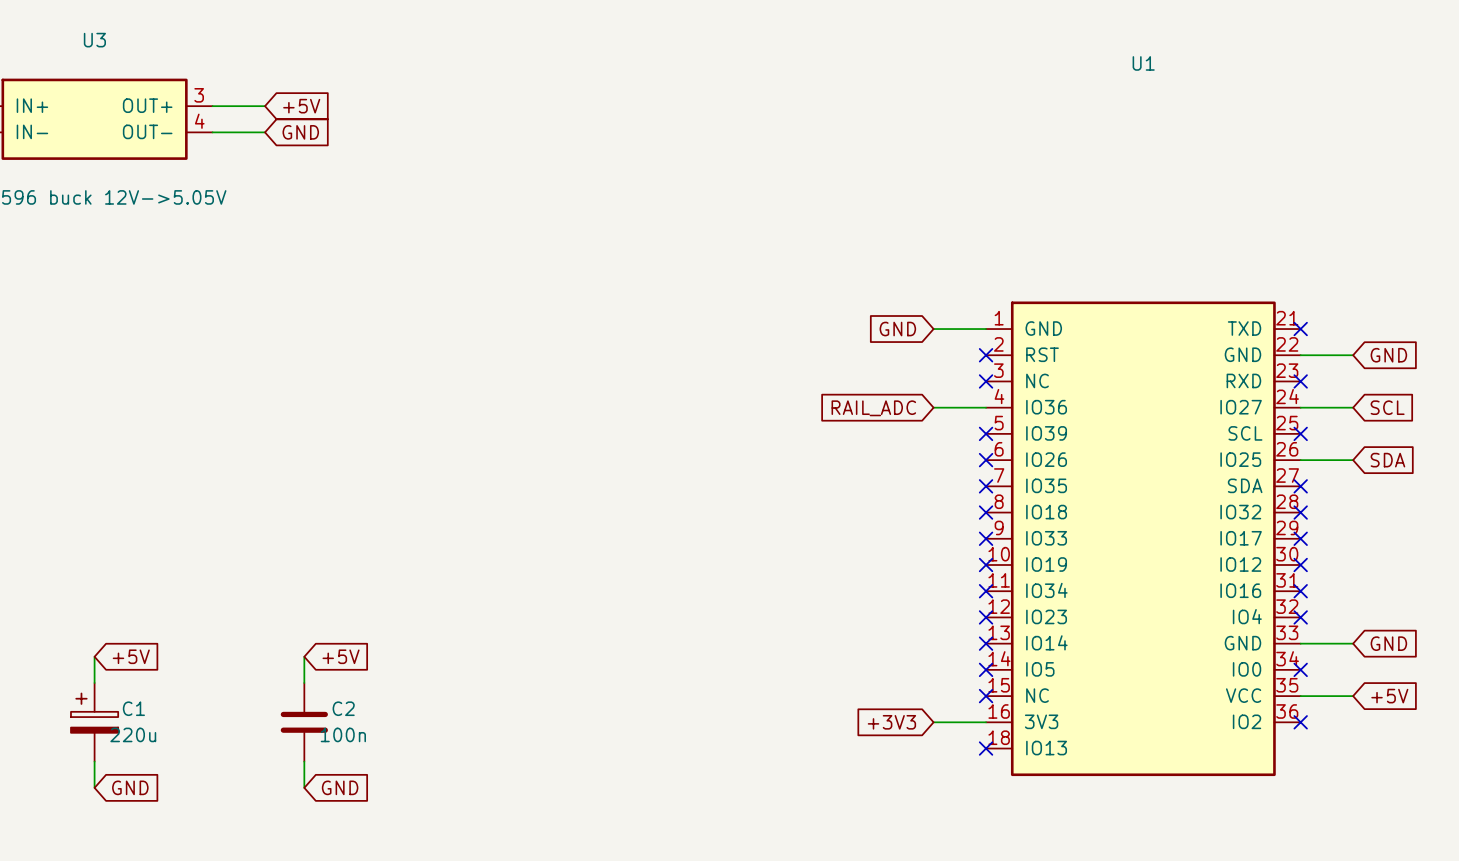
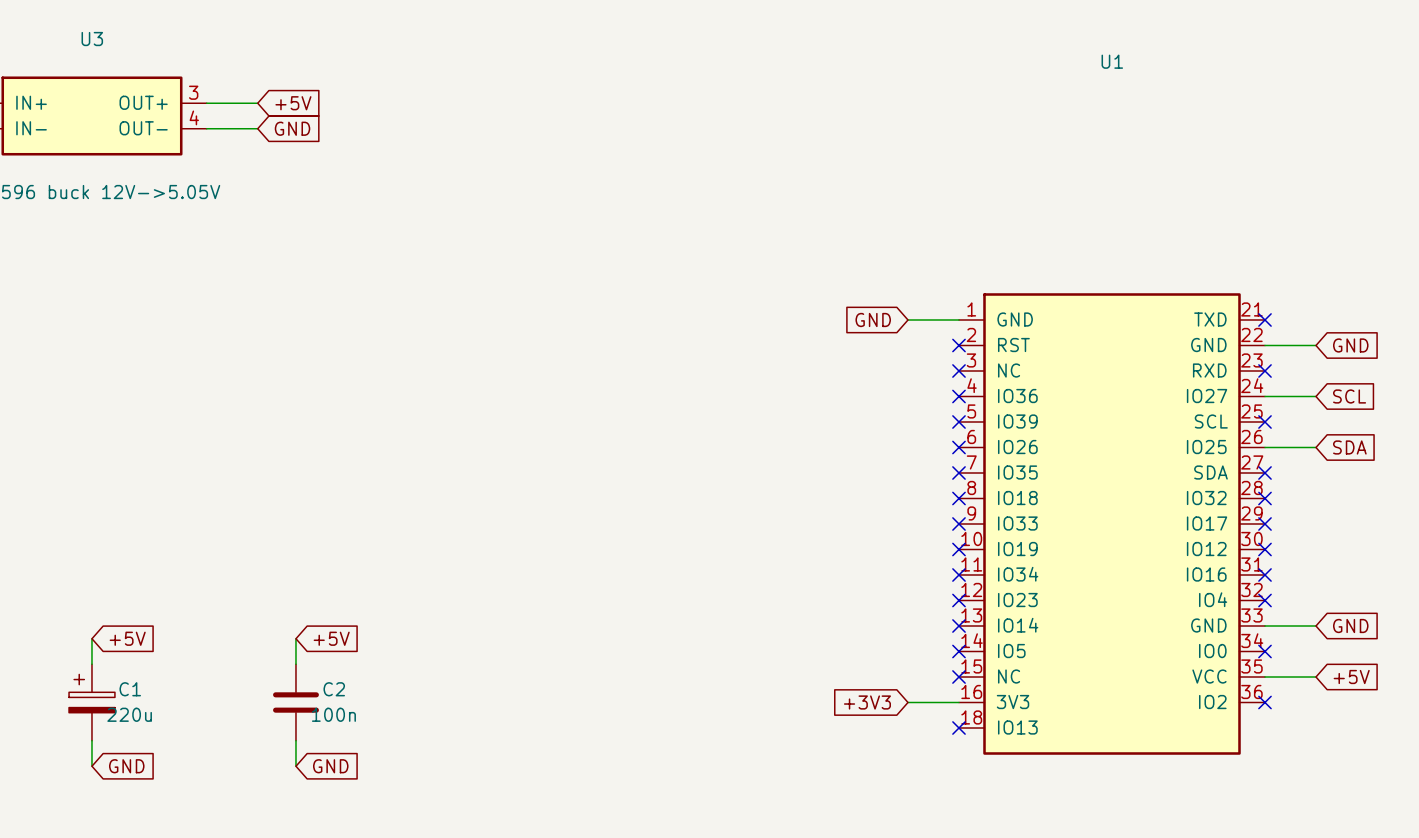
wire: (933, 407) (986, 407) -> none
no-connect mark: none -> (958, 396)
global label: RAIL_ADC (873, 408) -> none

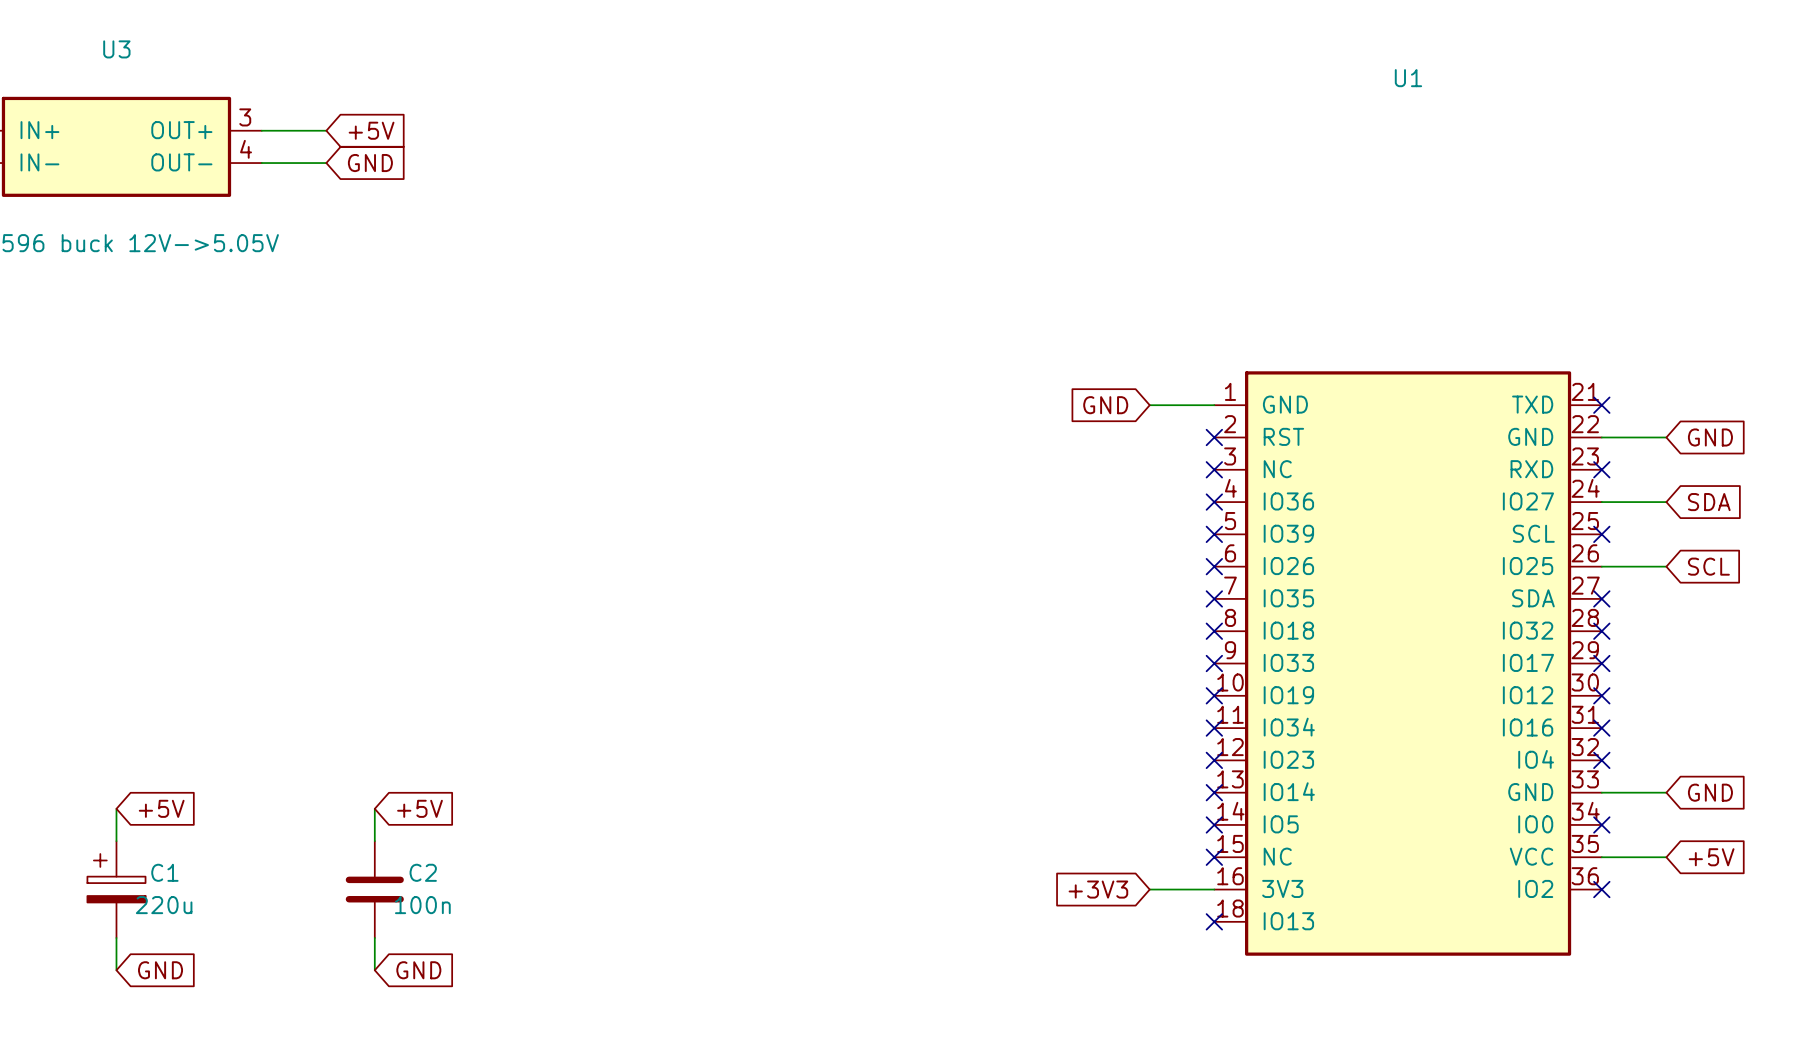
global label: SCL (1349, 396) -> SDA (1709, 502)
global label: SDA (1349, 447) -> SCL (1708, 566)

